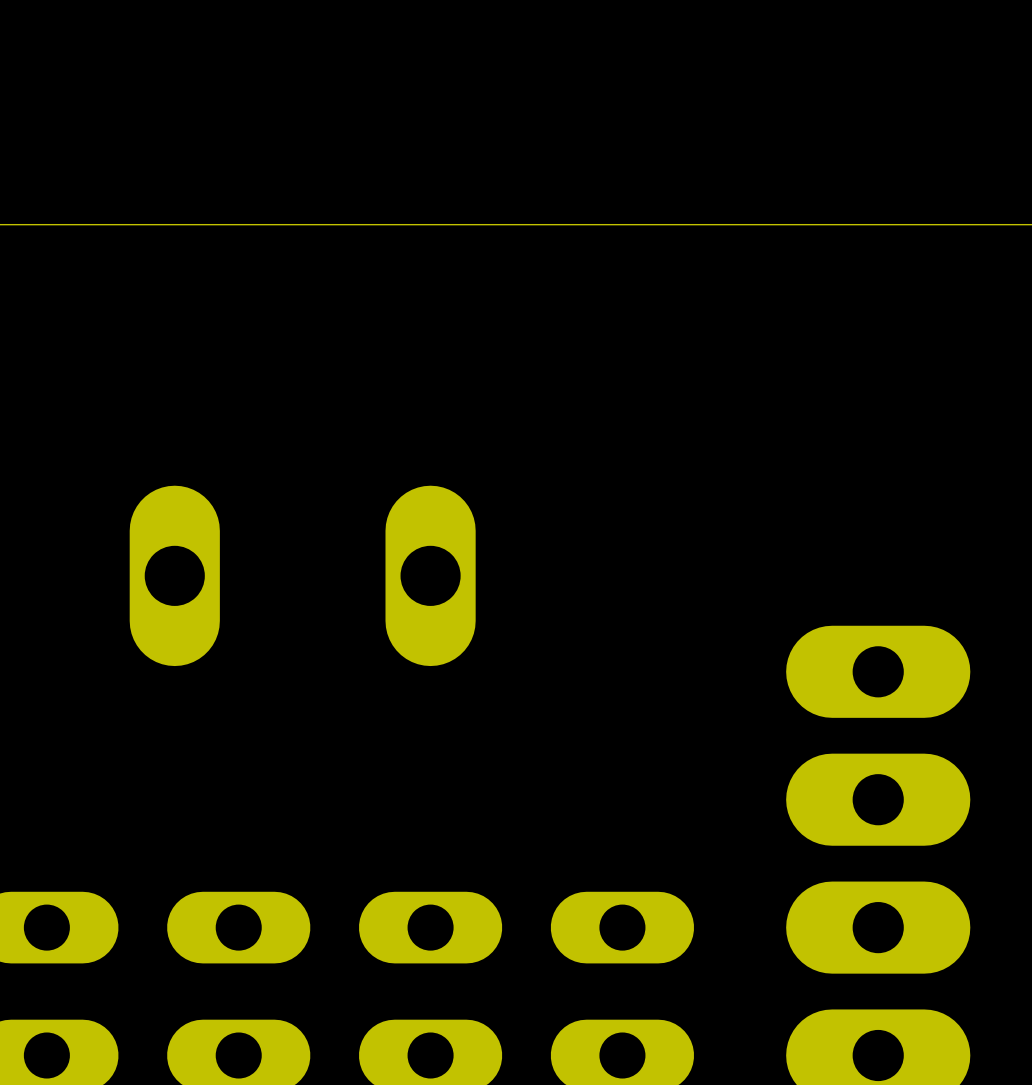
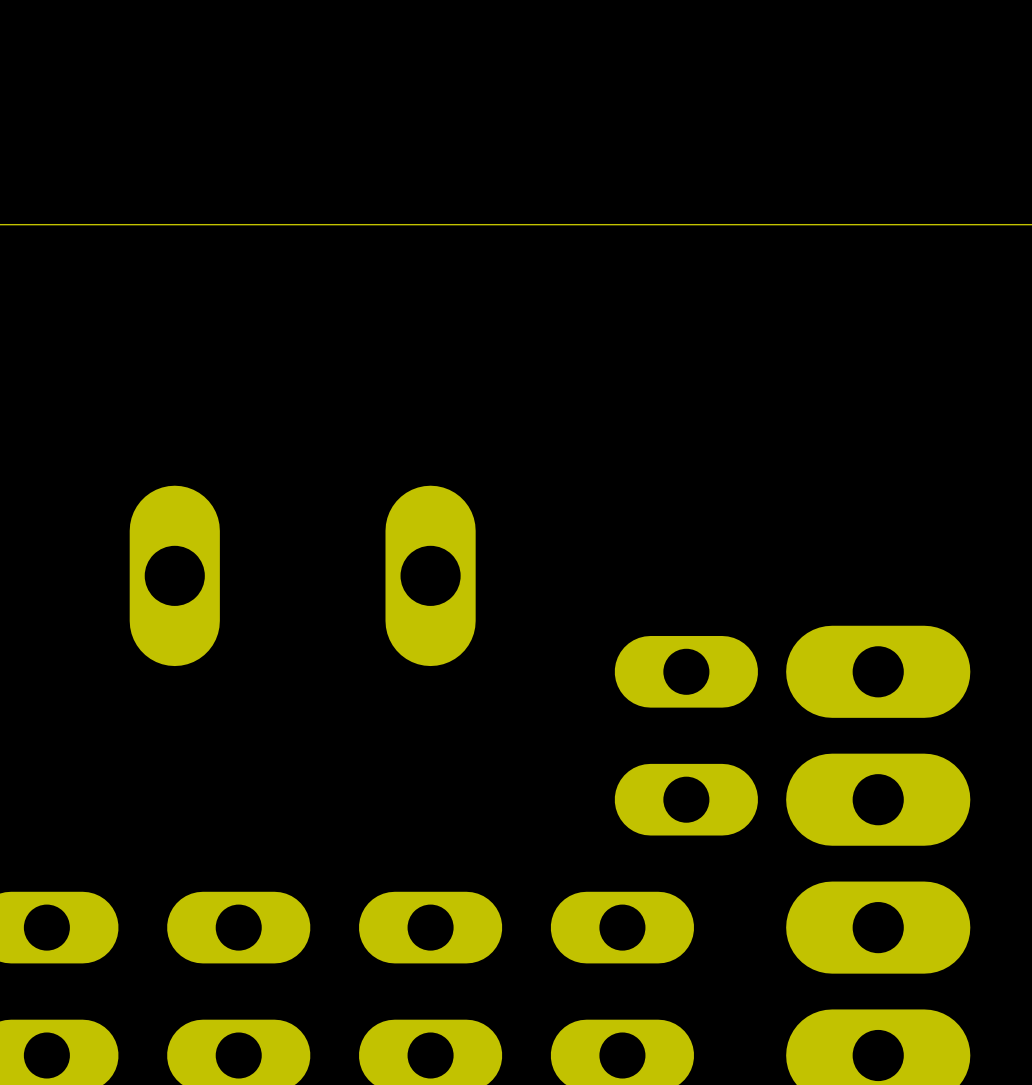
part: none -> (686, 735)

